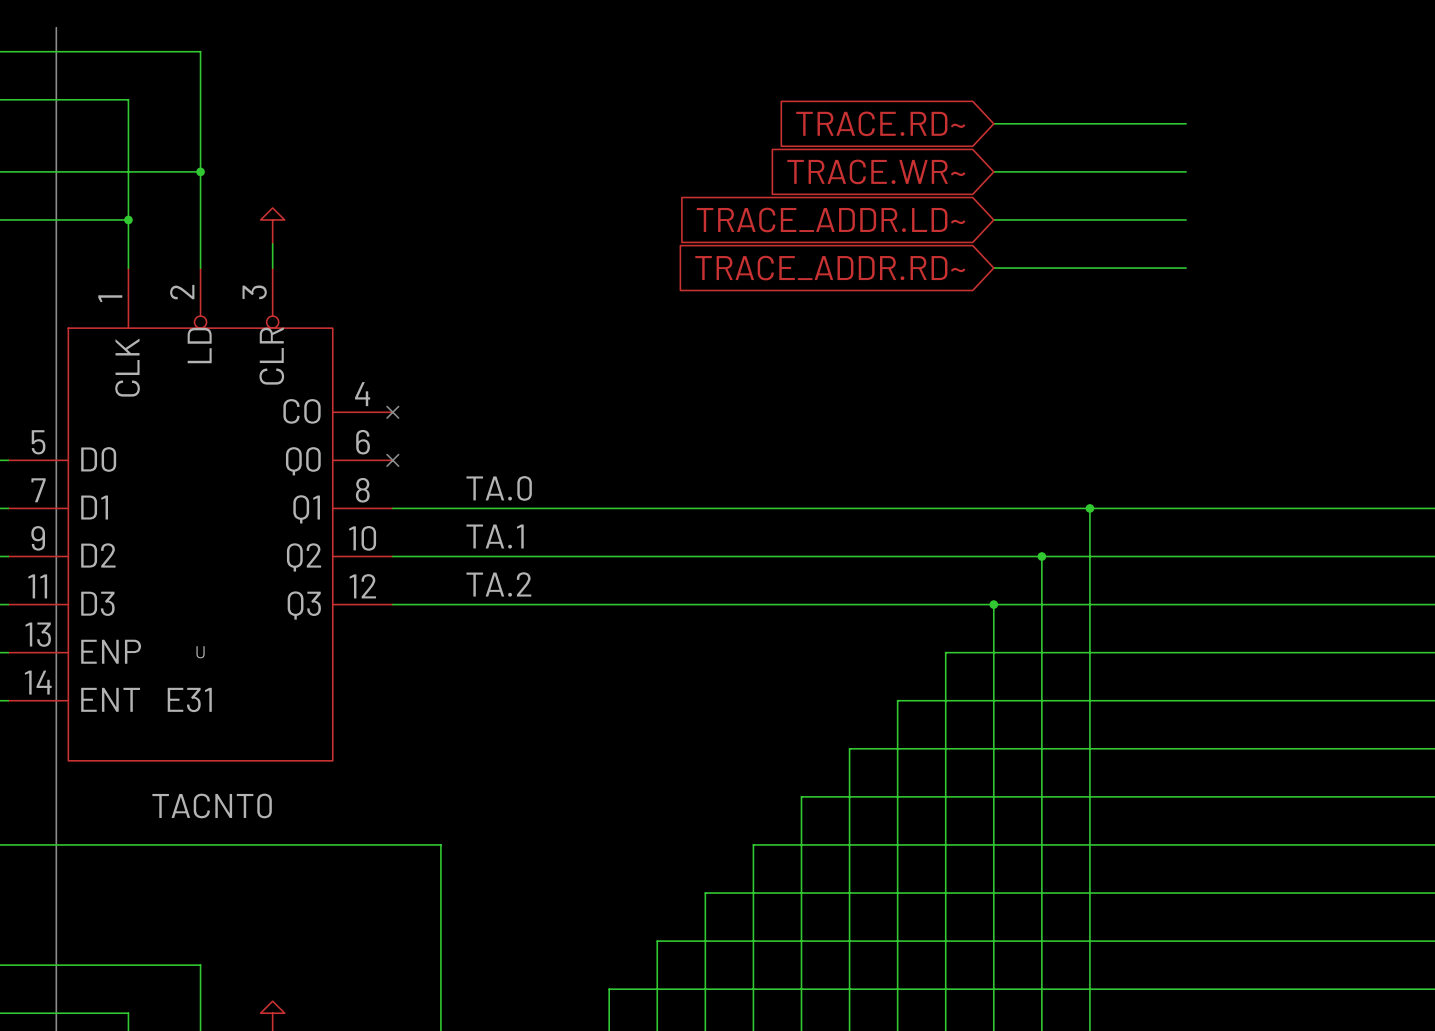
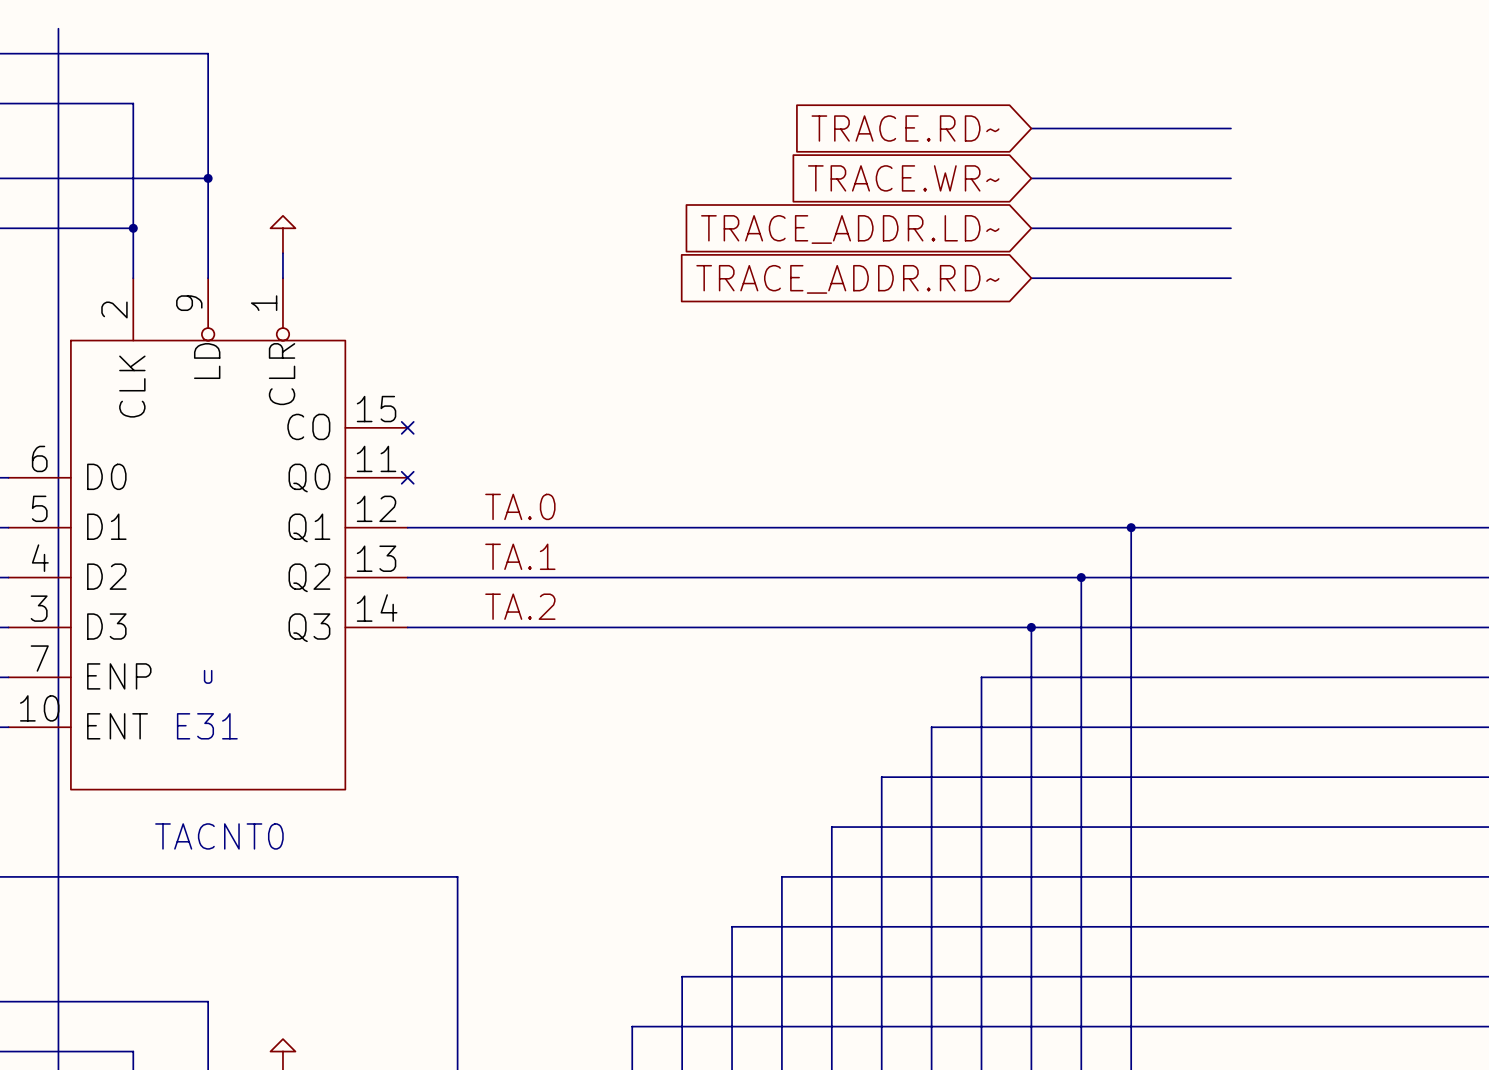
U symbol: [8, 268, 393, 761] -> [8, 278, 408, 790]

